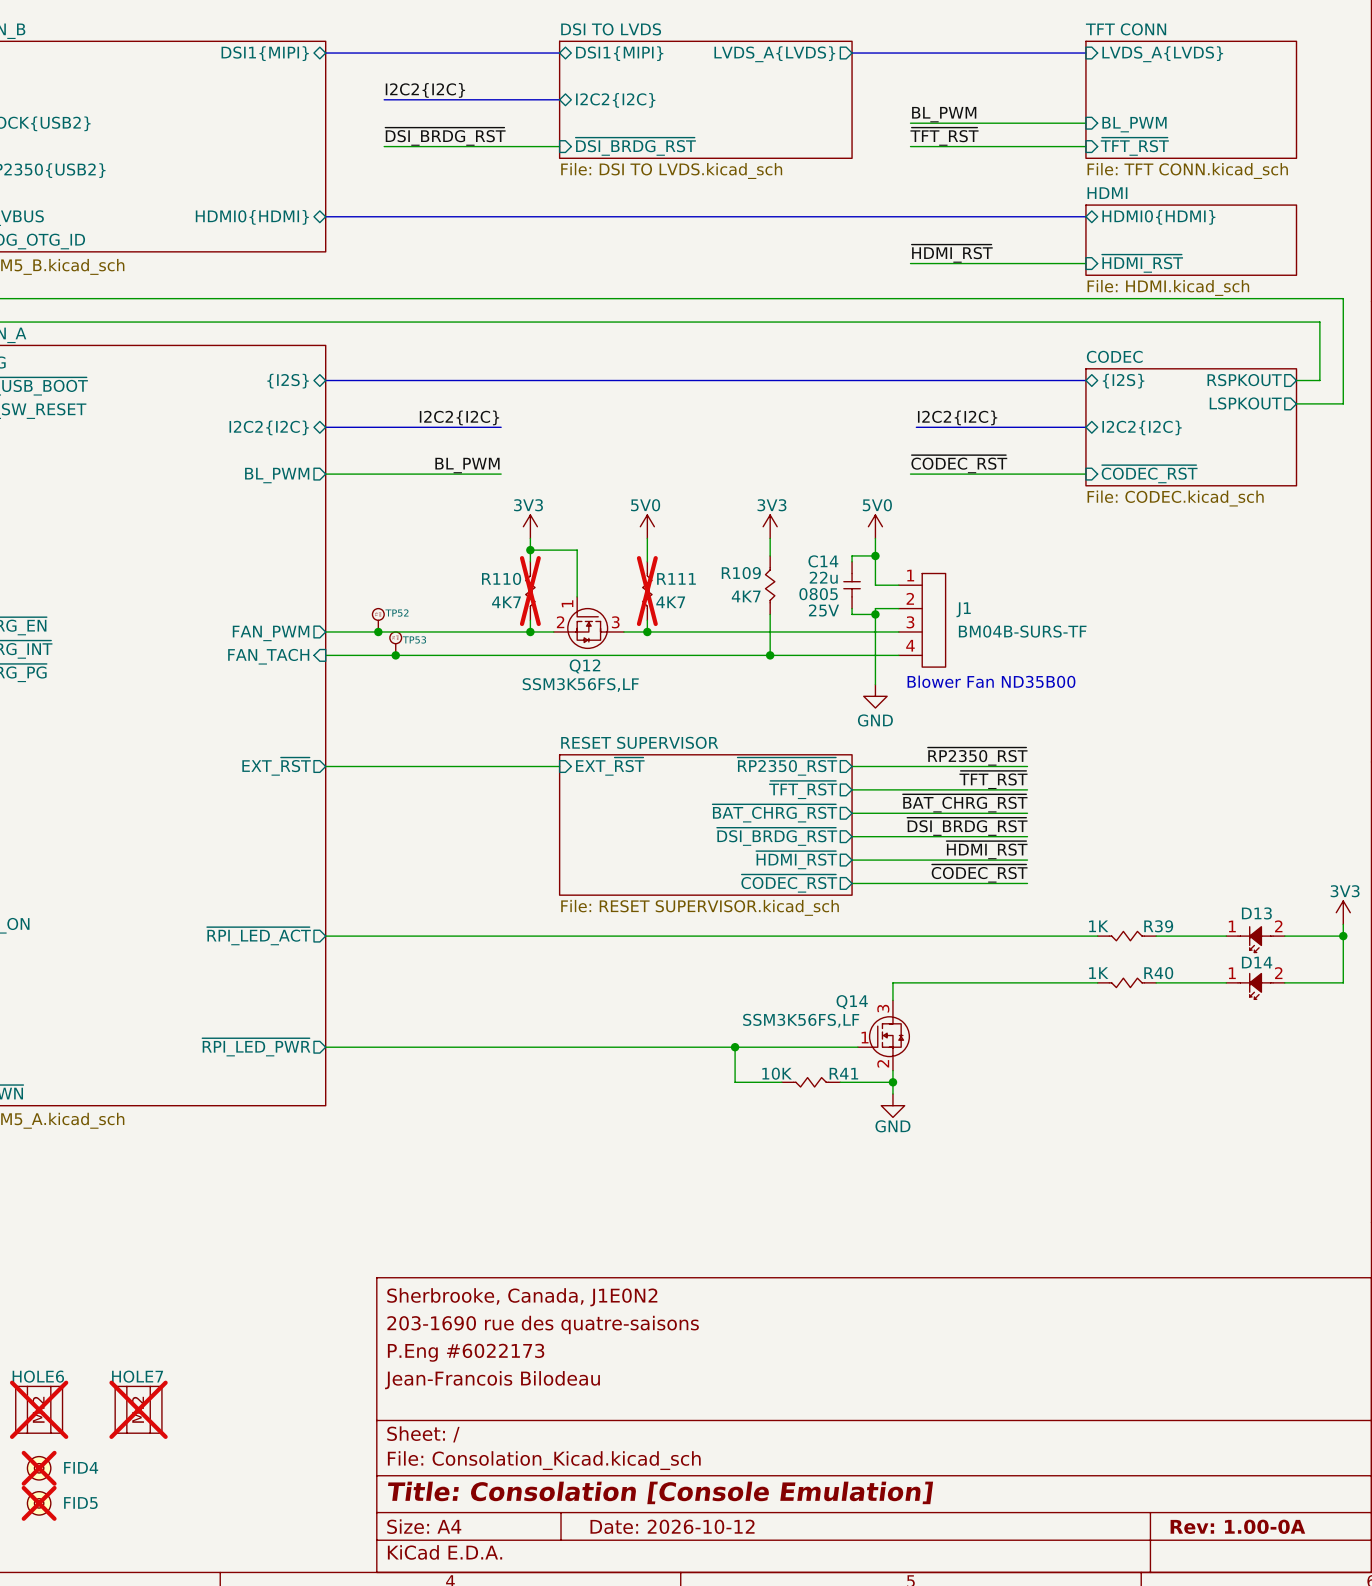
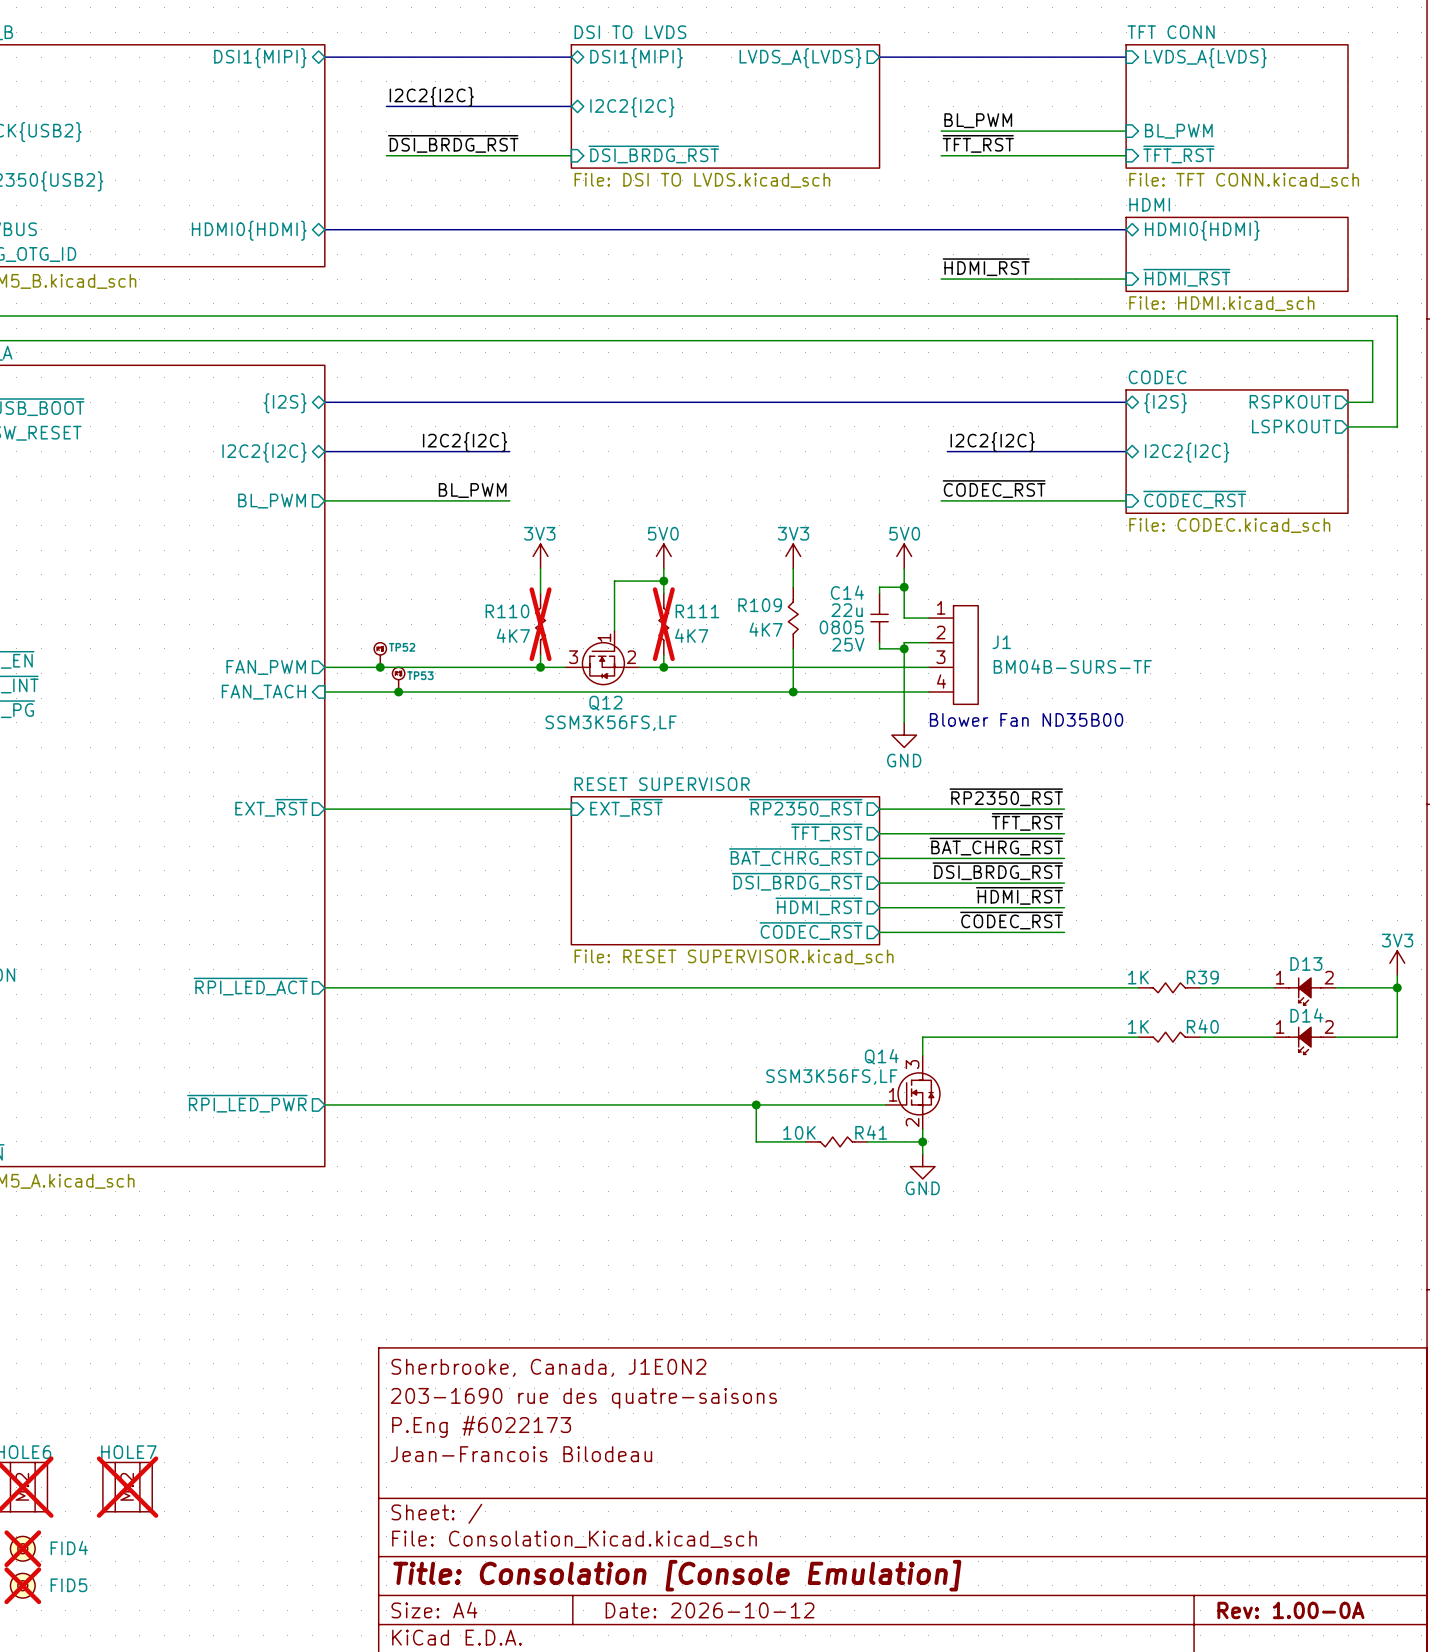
wire: (530, 550) (577, 550) (577, 596) -> none
junction: (530, 550) -> none
wire: none -> (663, 581) (614, 581) (614, 630)
junction: none -> (663, 581)
Q12 flip: as is (587, 628) -> left-right (603, 663)

